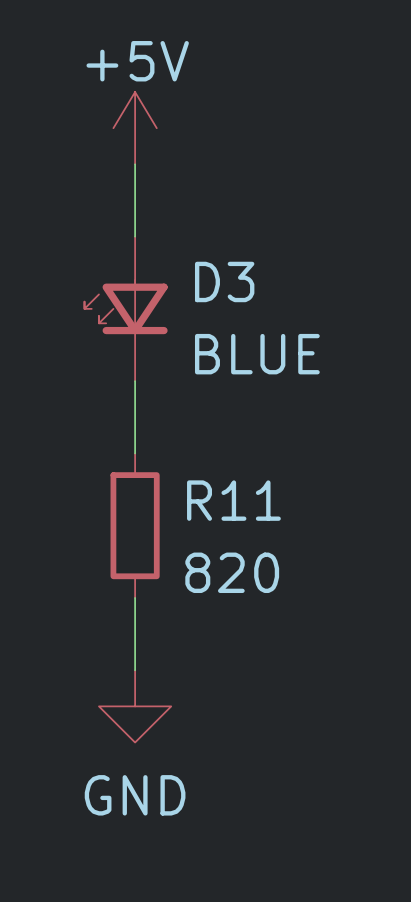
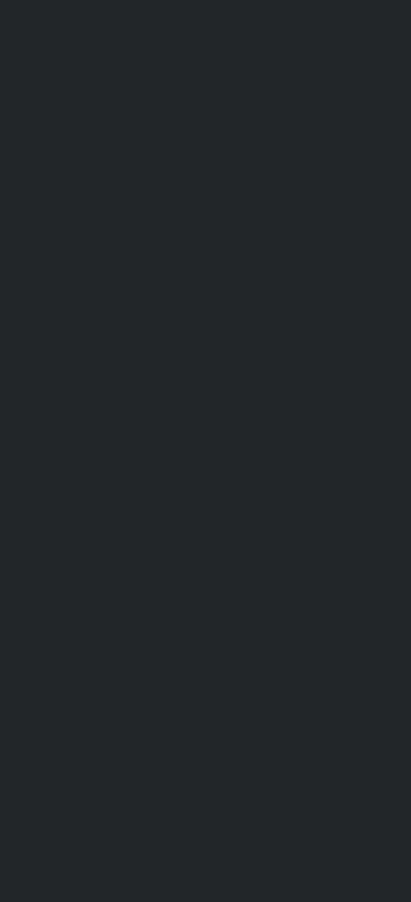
power symbol: +5V (135, 128) -> none
wire: (135, 164) (135, 236) -> none
D3: BLUE (126, 308) -> none
wire: (135, 381) (135, 453) -> none
R11: 820 (135, 525) -> none
wire: (135, 597) (135, 670) -> none
power symbol: GND (135, 706) -> none

